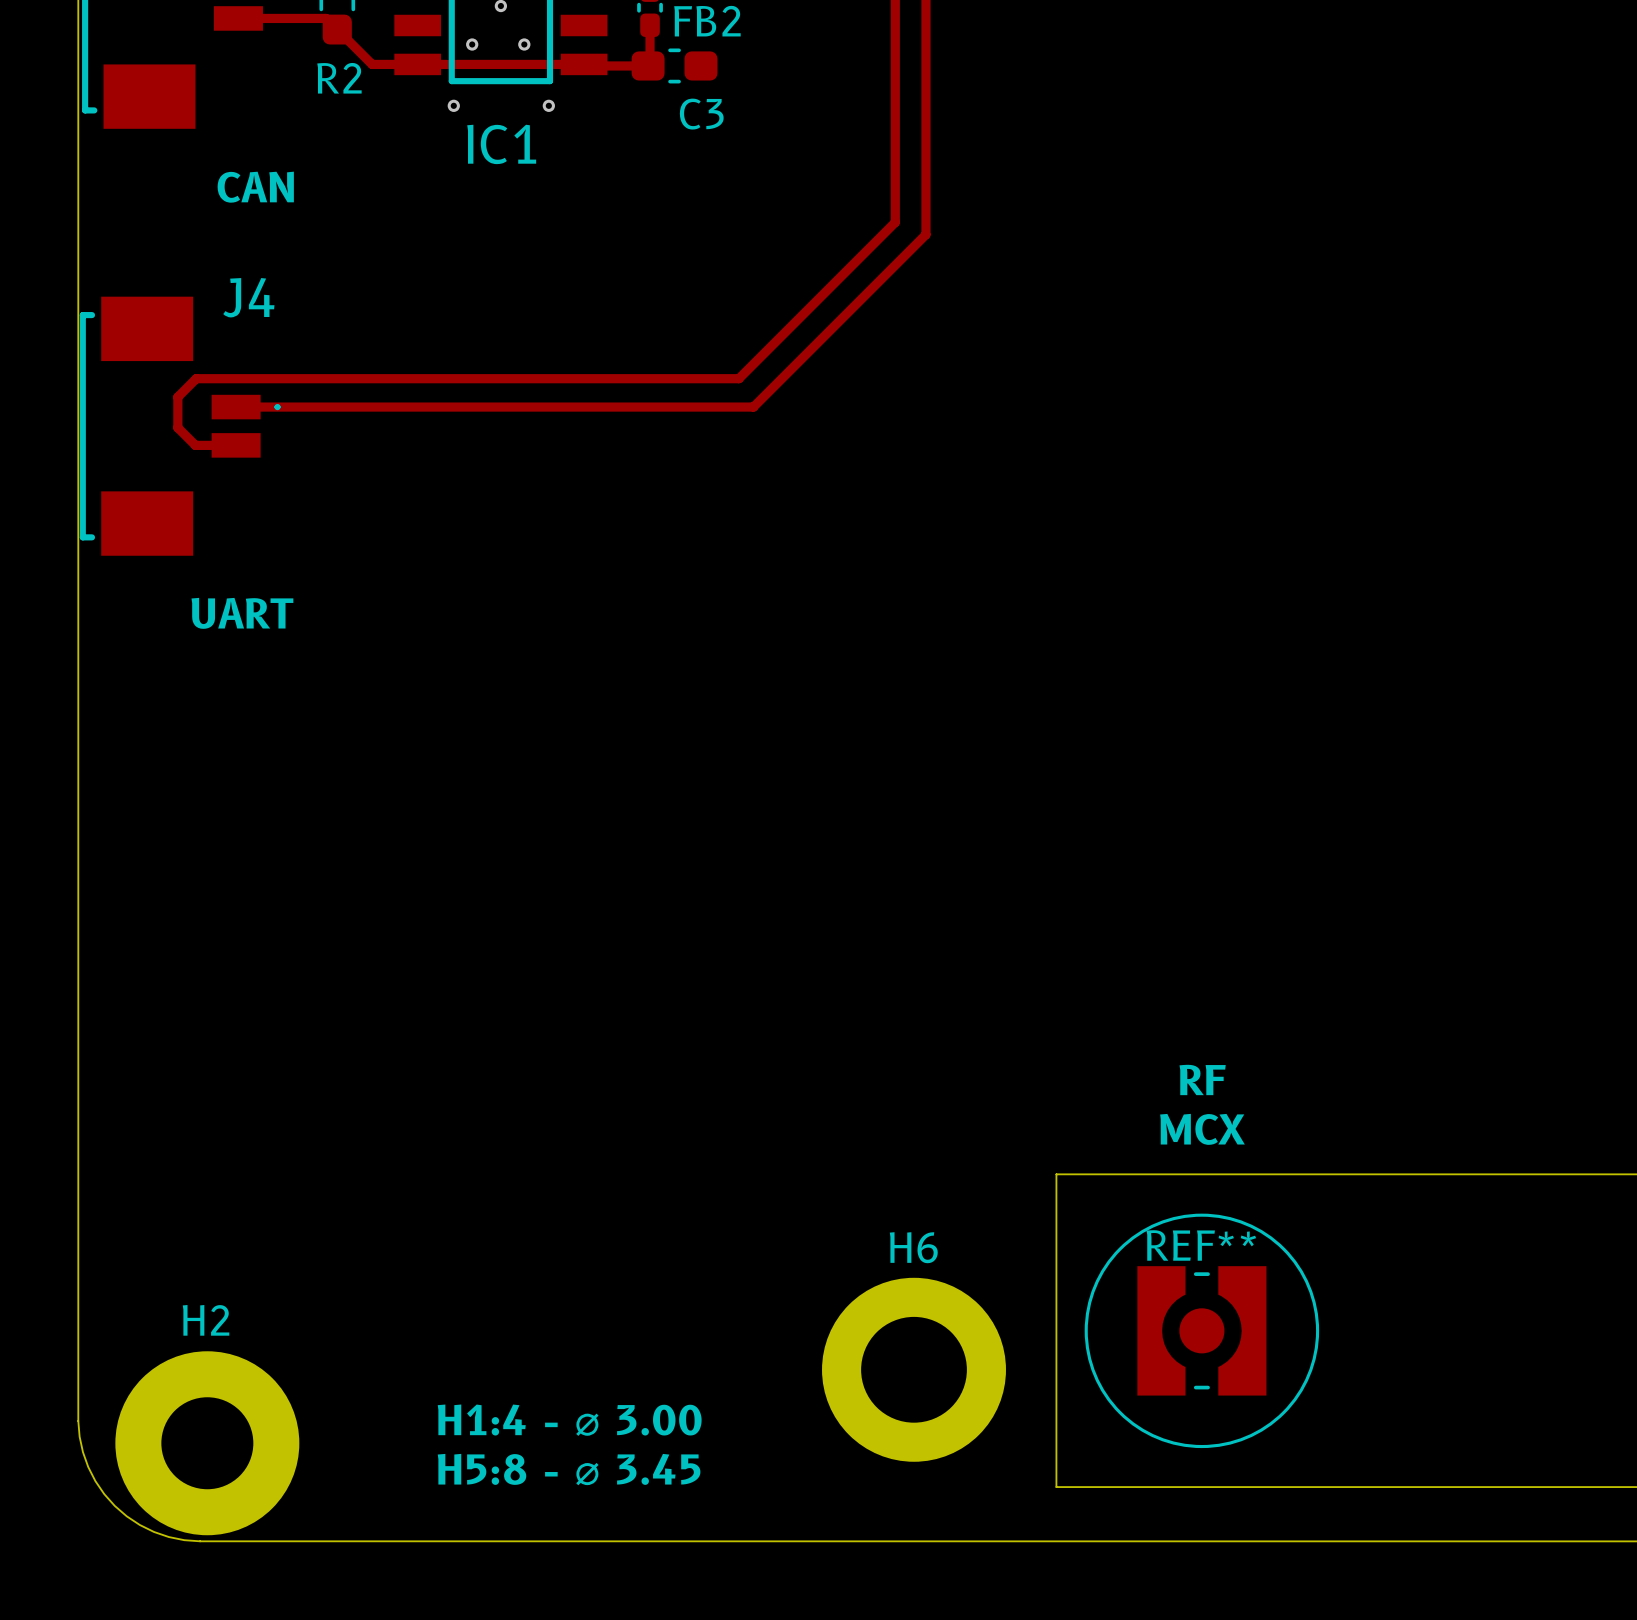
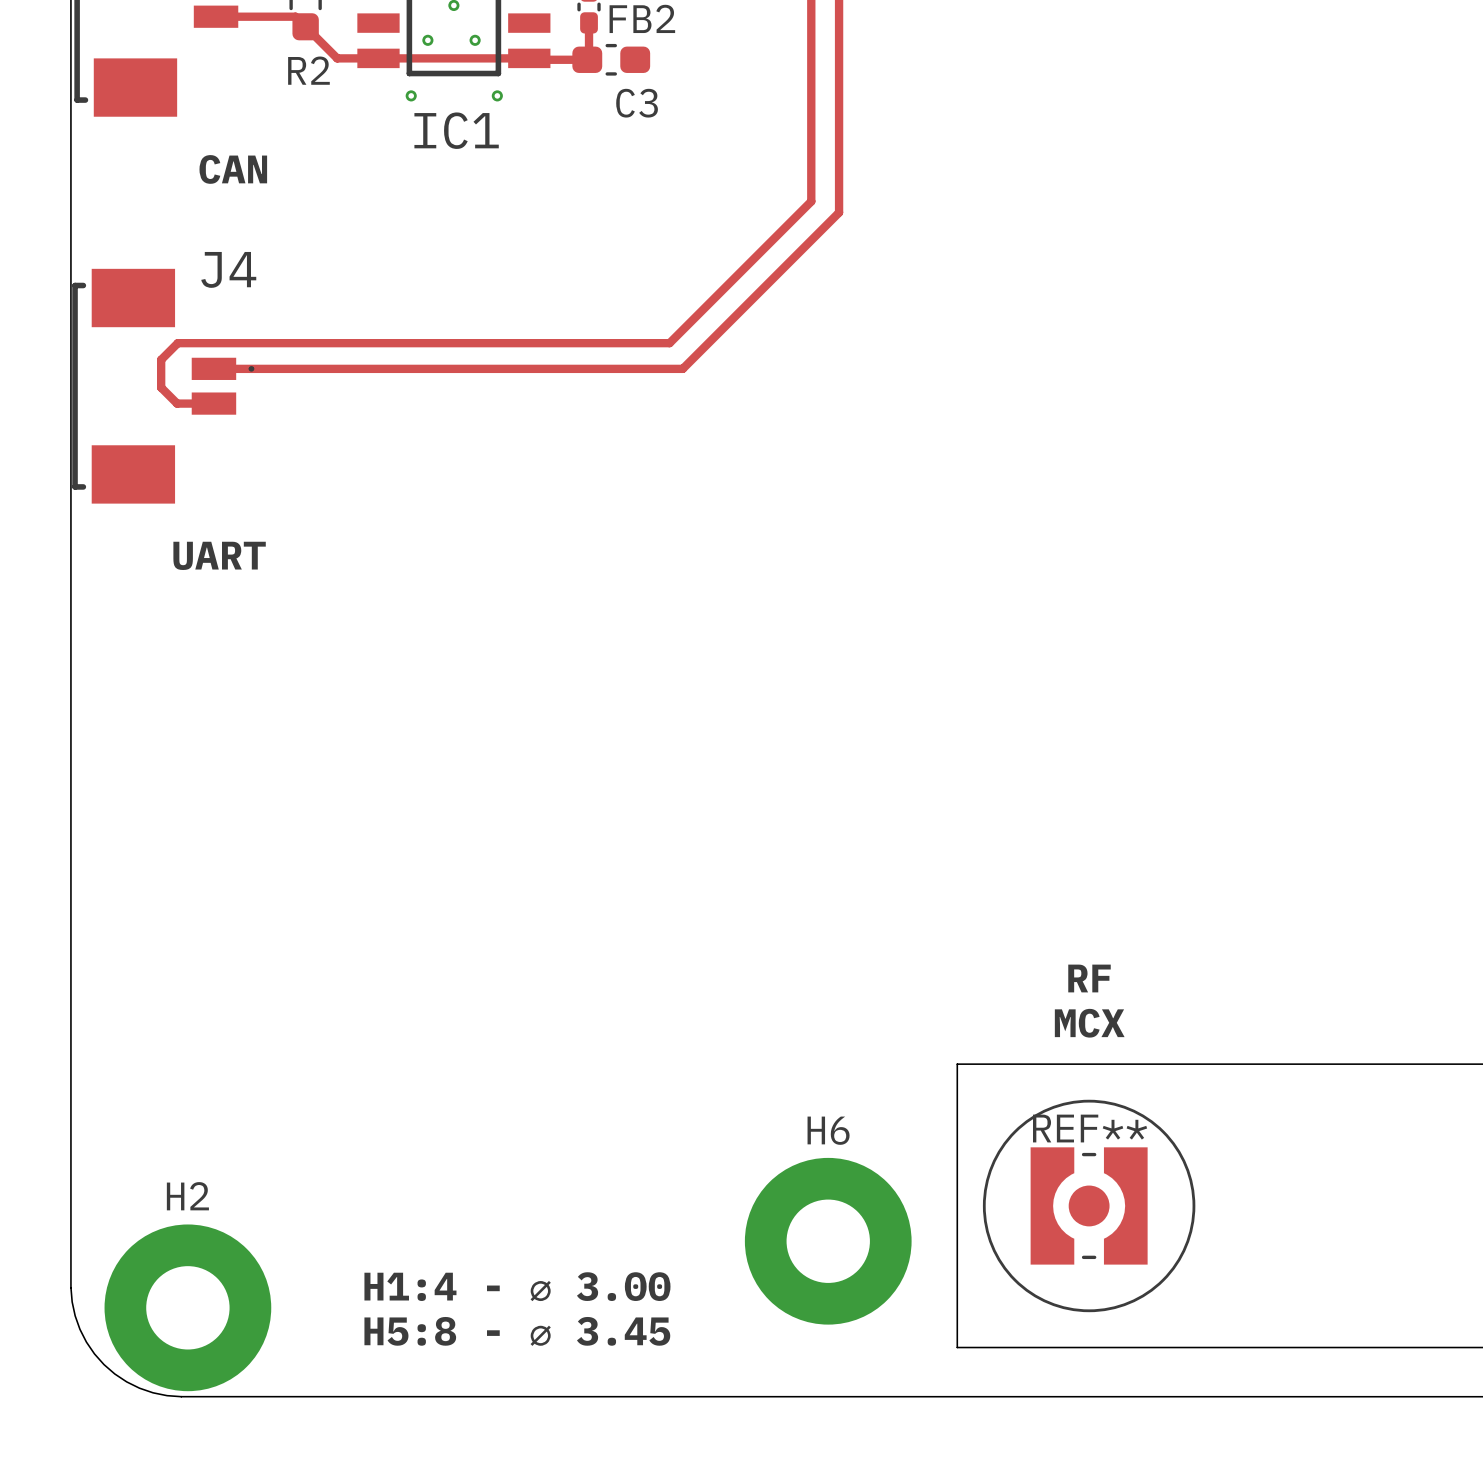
H6 footprint: [822, 1277, 1006, 1462] -> [744, 1157, 912, 1325]

